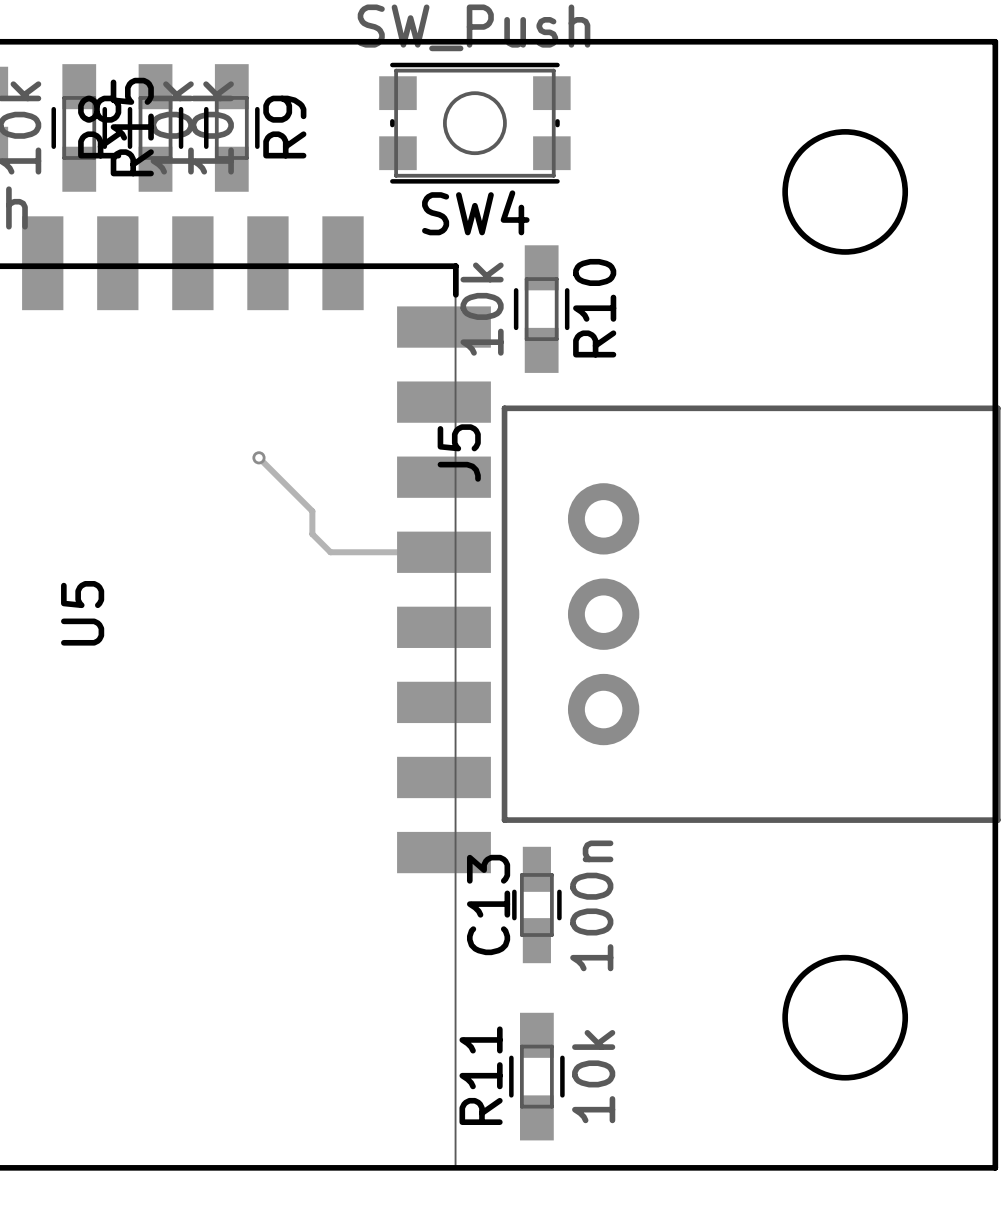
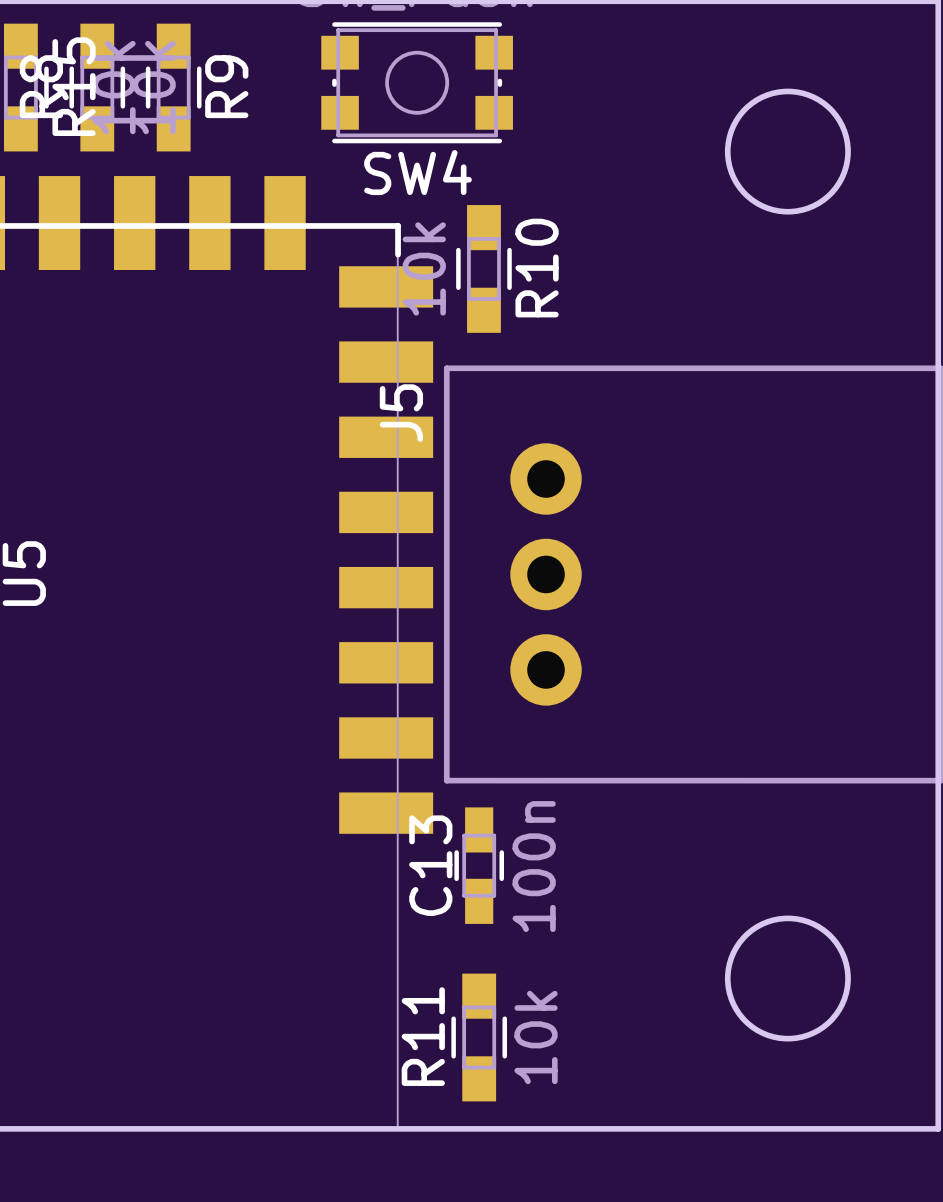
track: (258, 457) (312, 511) (312, 534) (330, 552) (417, 552) -> none
via: (258, 457) -> none

